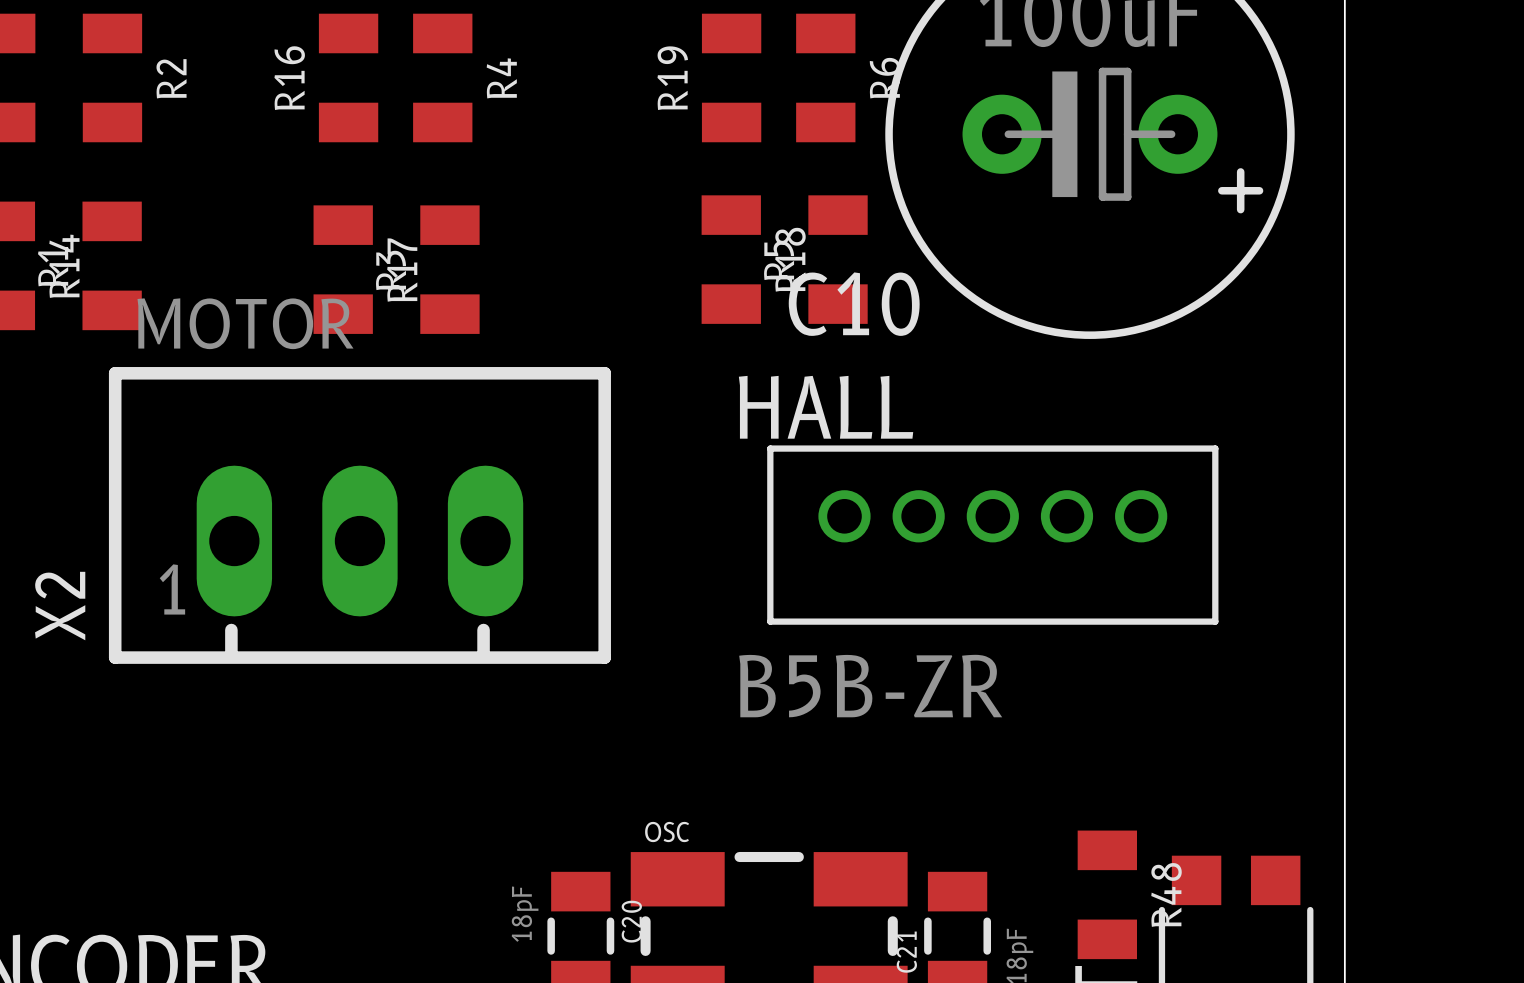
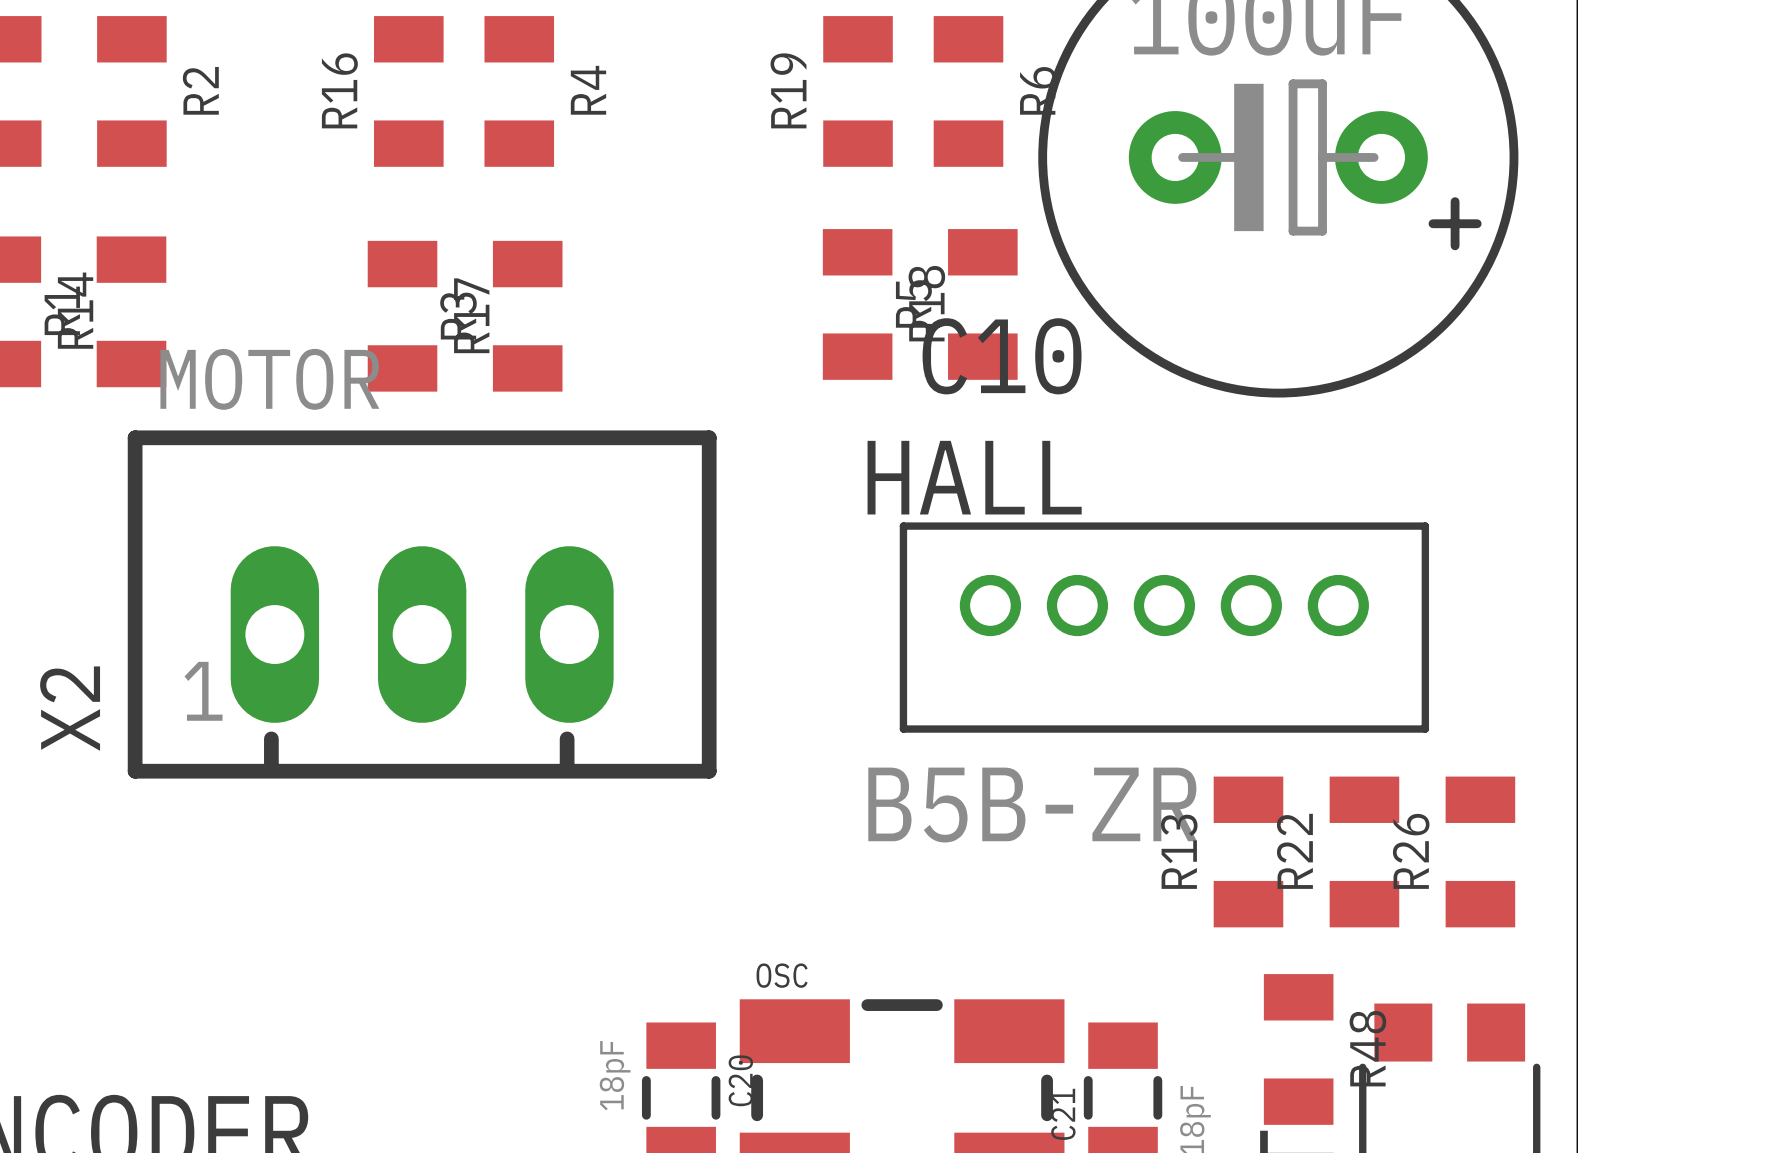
R13: none -> (1248, 851)
R22: none -> (1364, 851)
R26: none -> (1480, 851)

